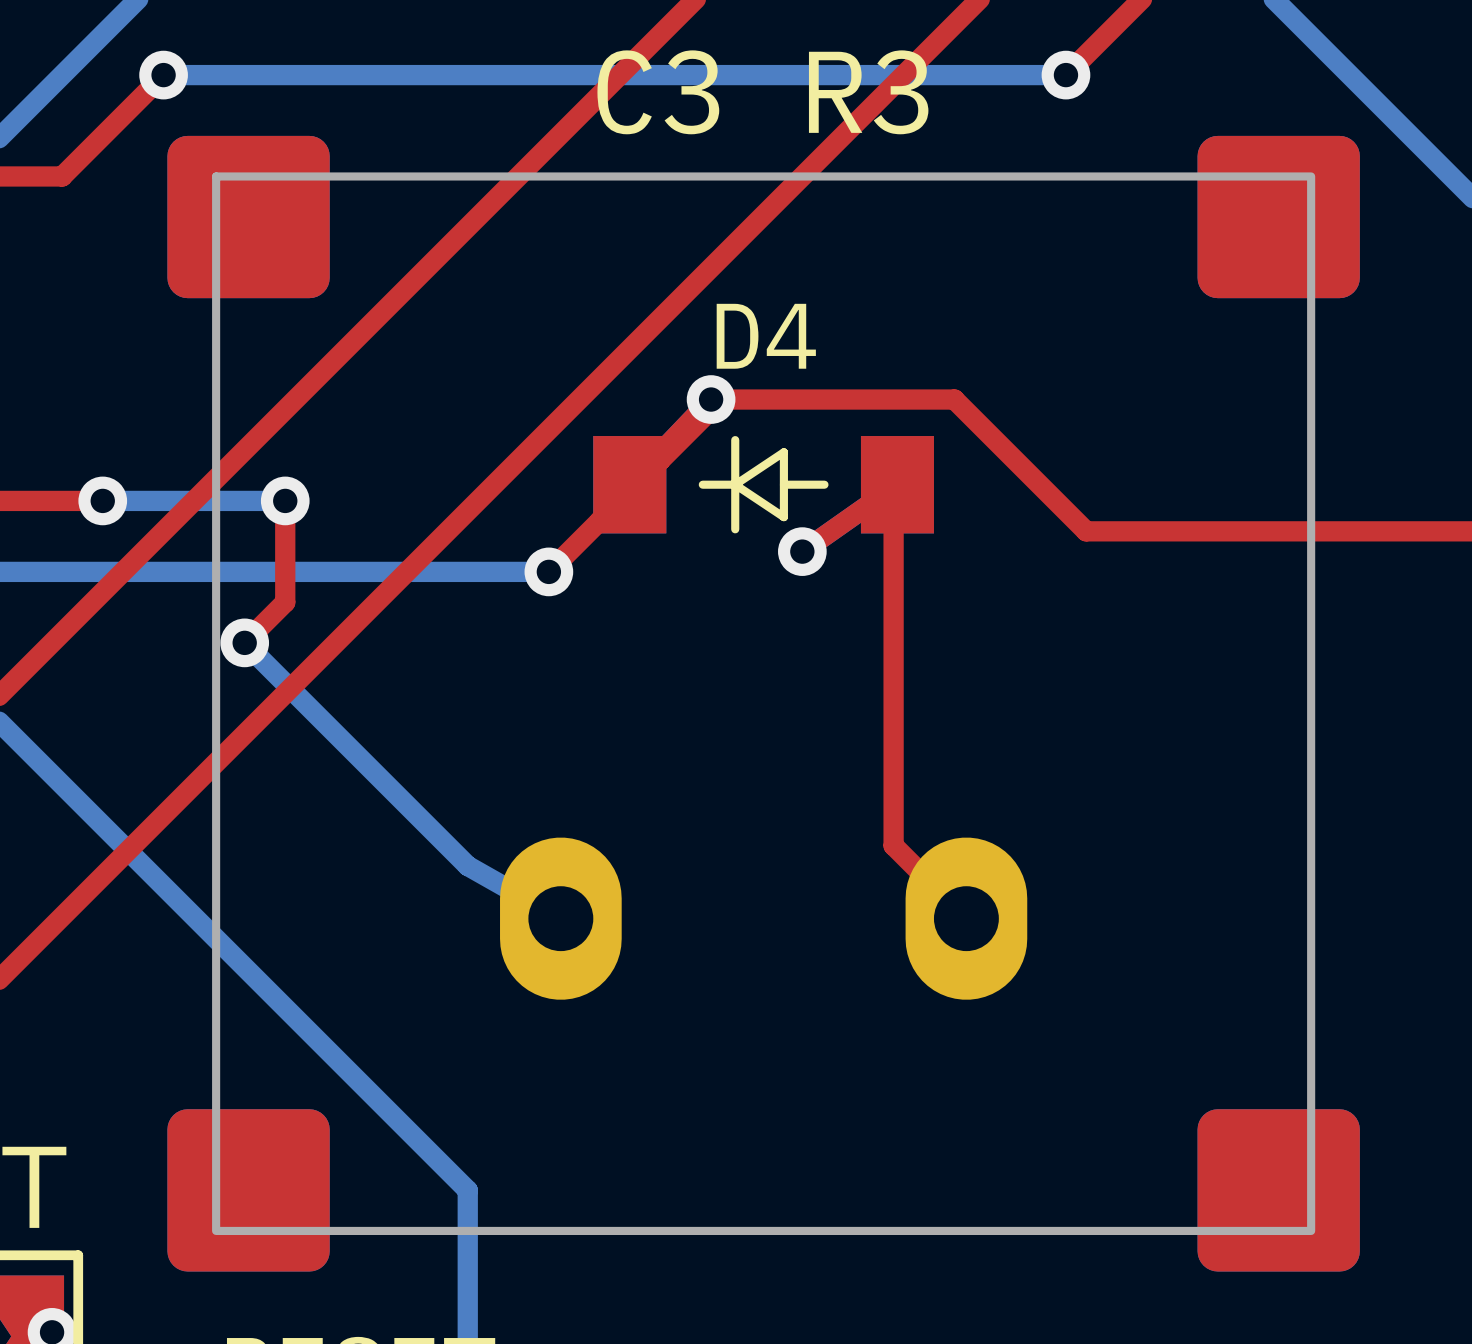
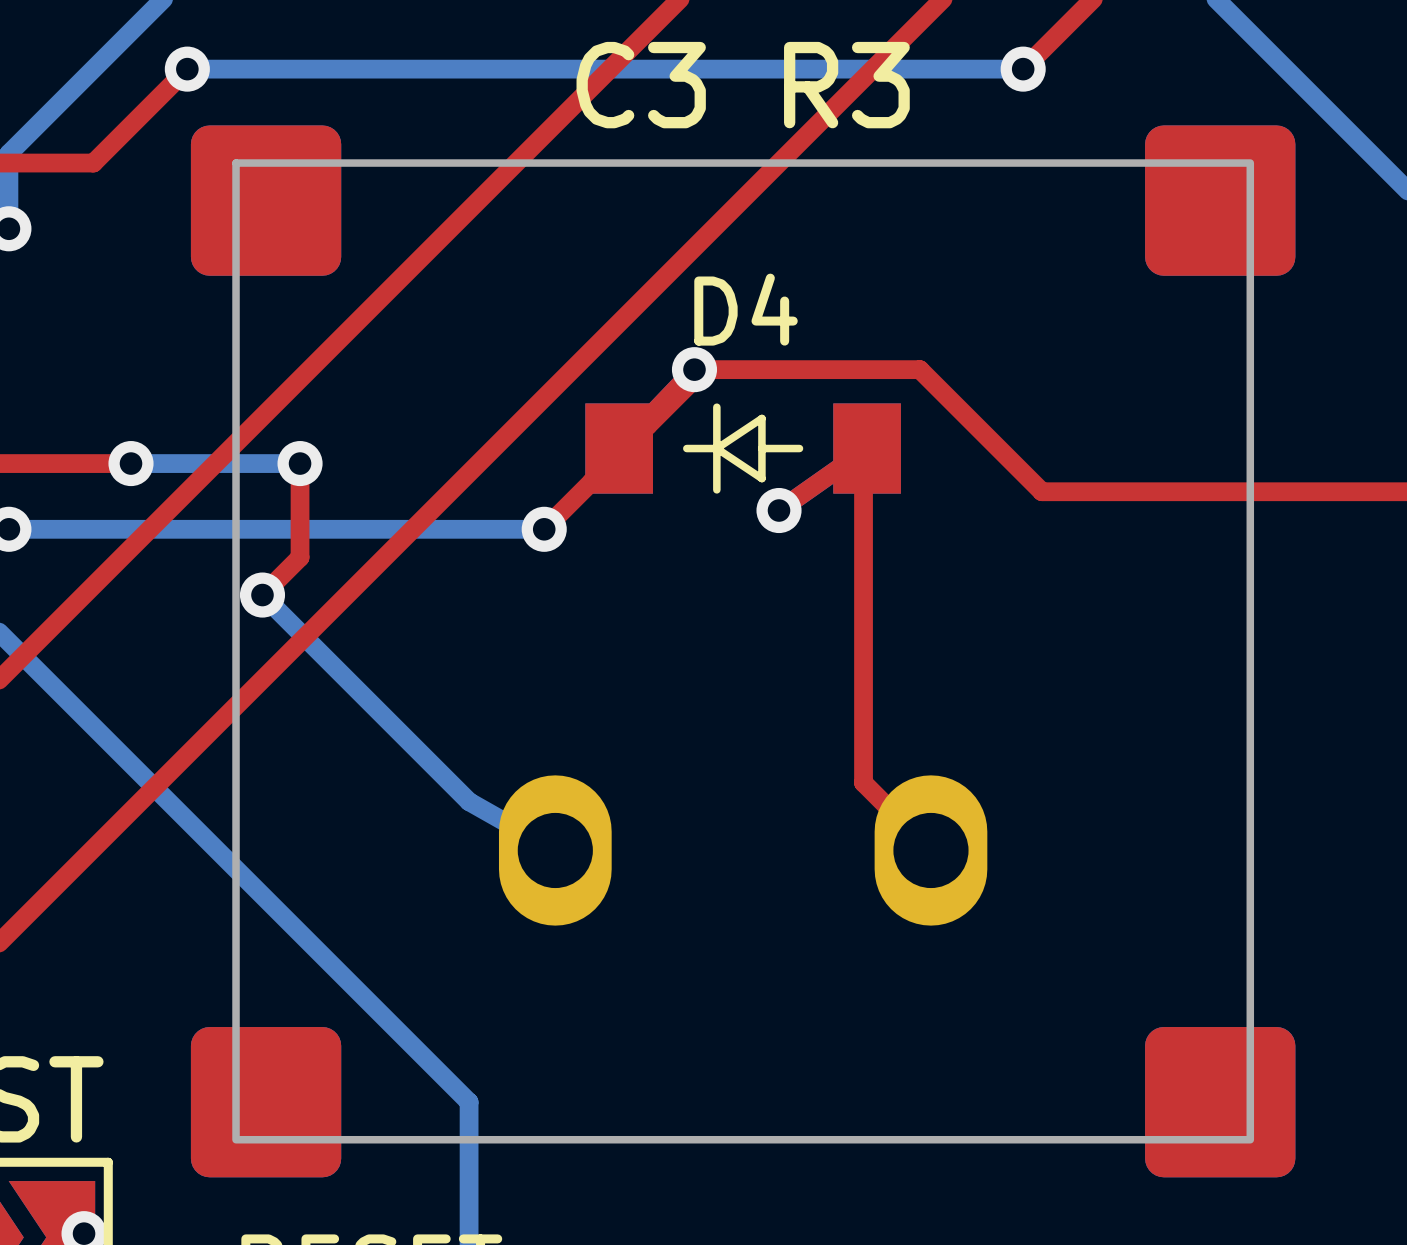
C3 R3 footprint: [167, 135, 1360, 1272] -> [190, 125, 1296, 1178]

